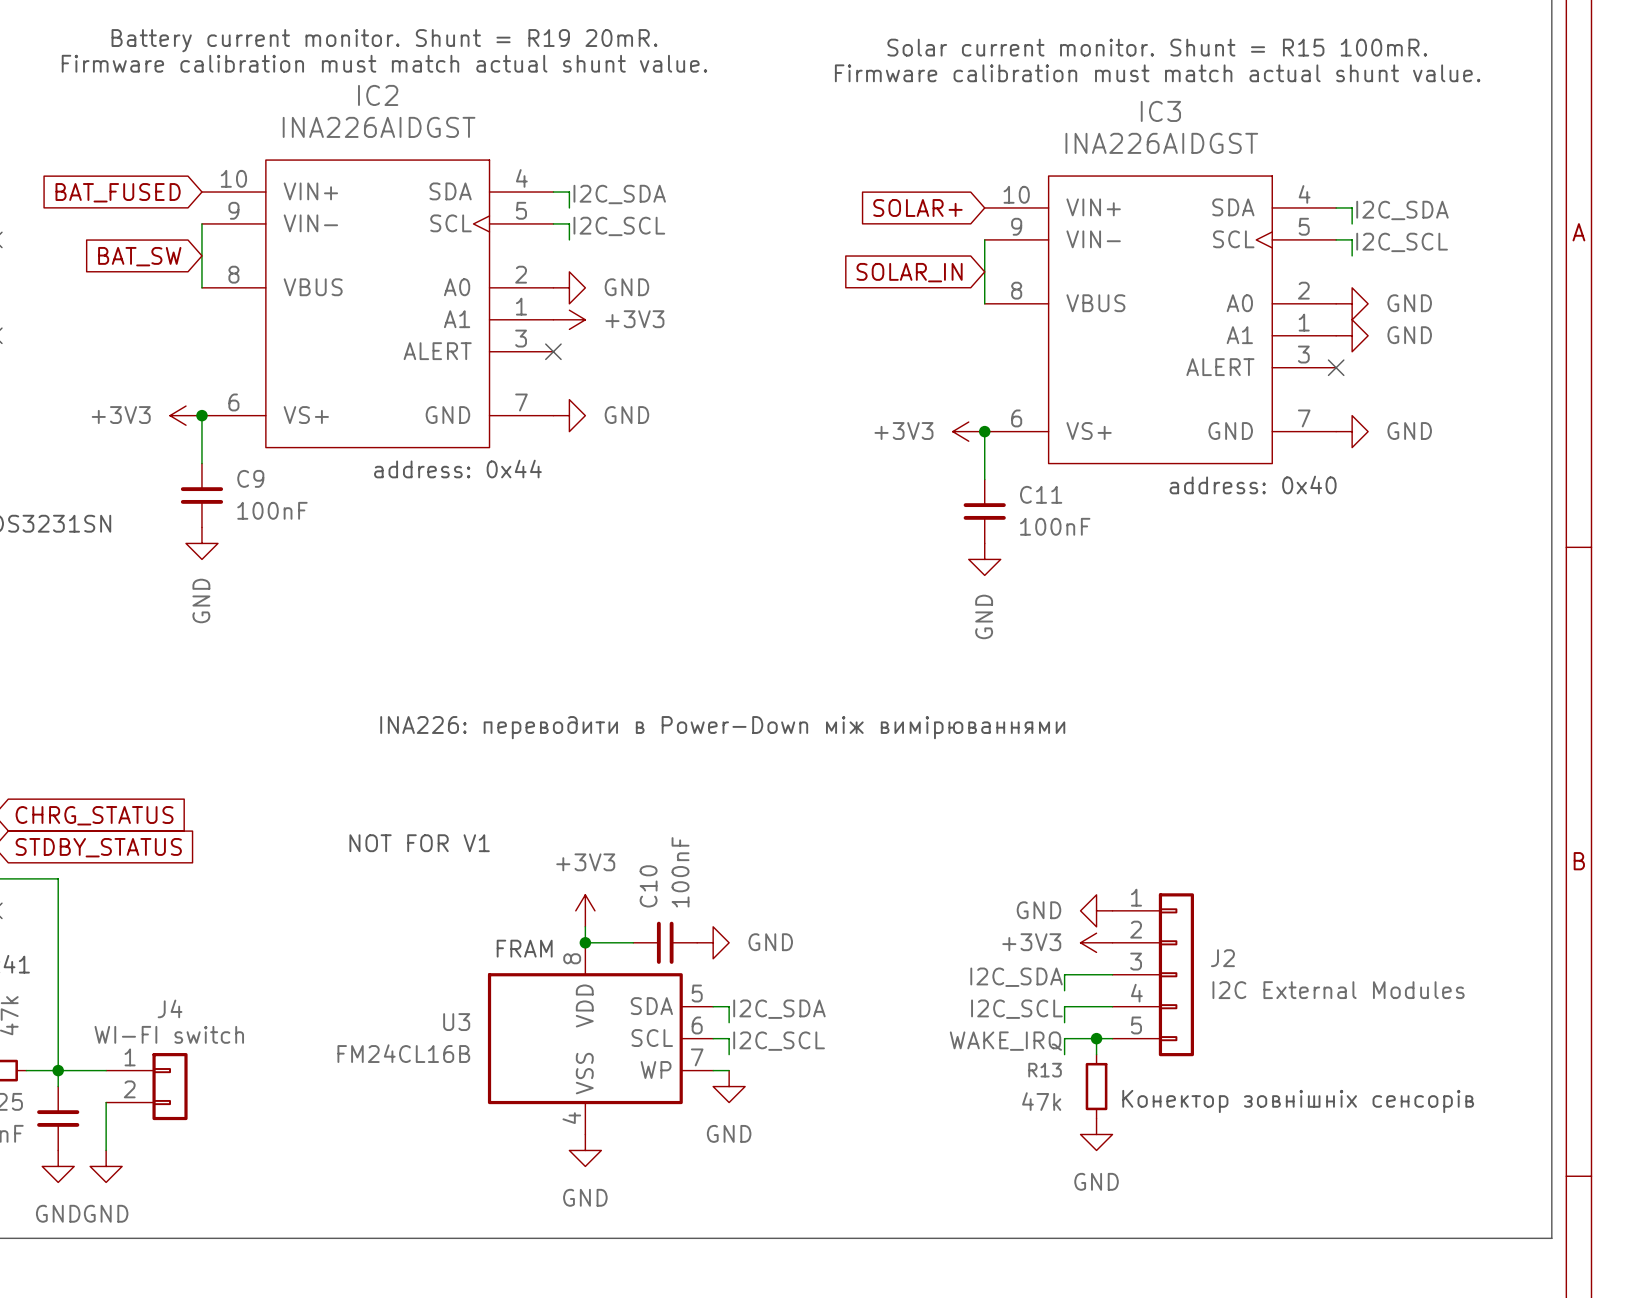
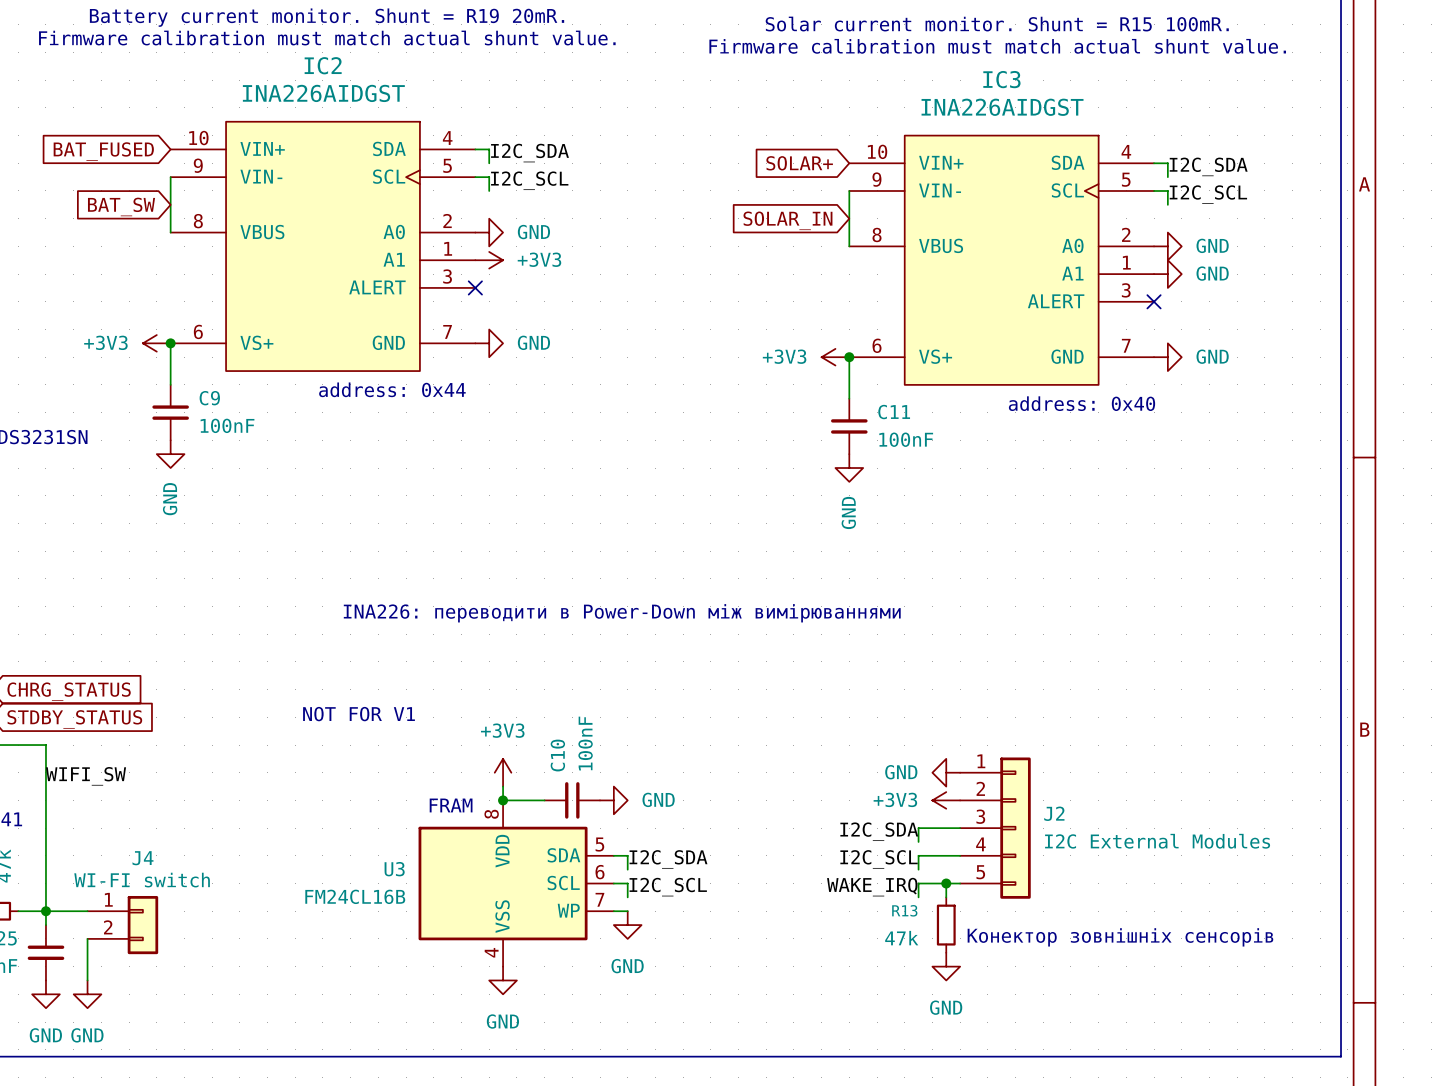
label: none -> WIFI_SW (86, 776)

